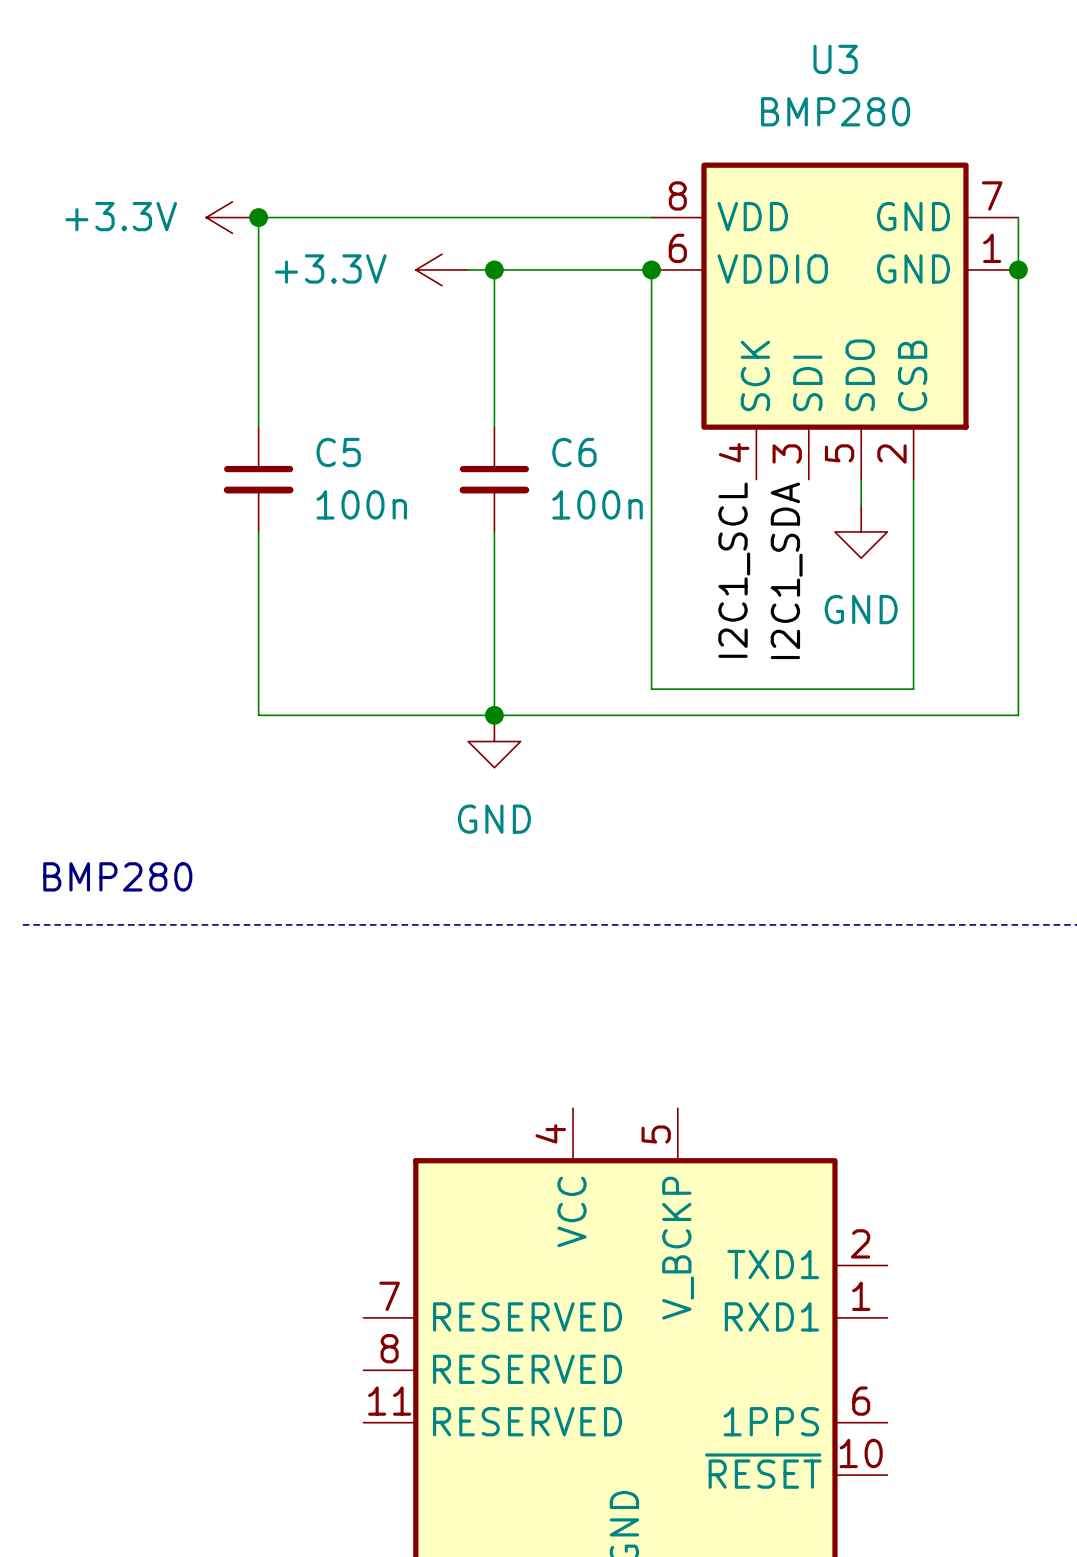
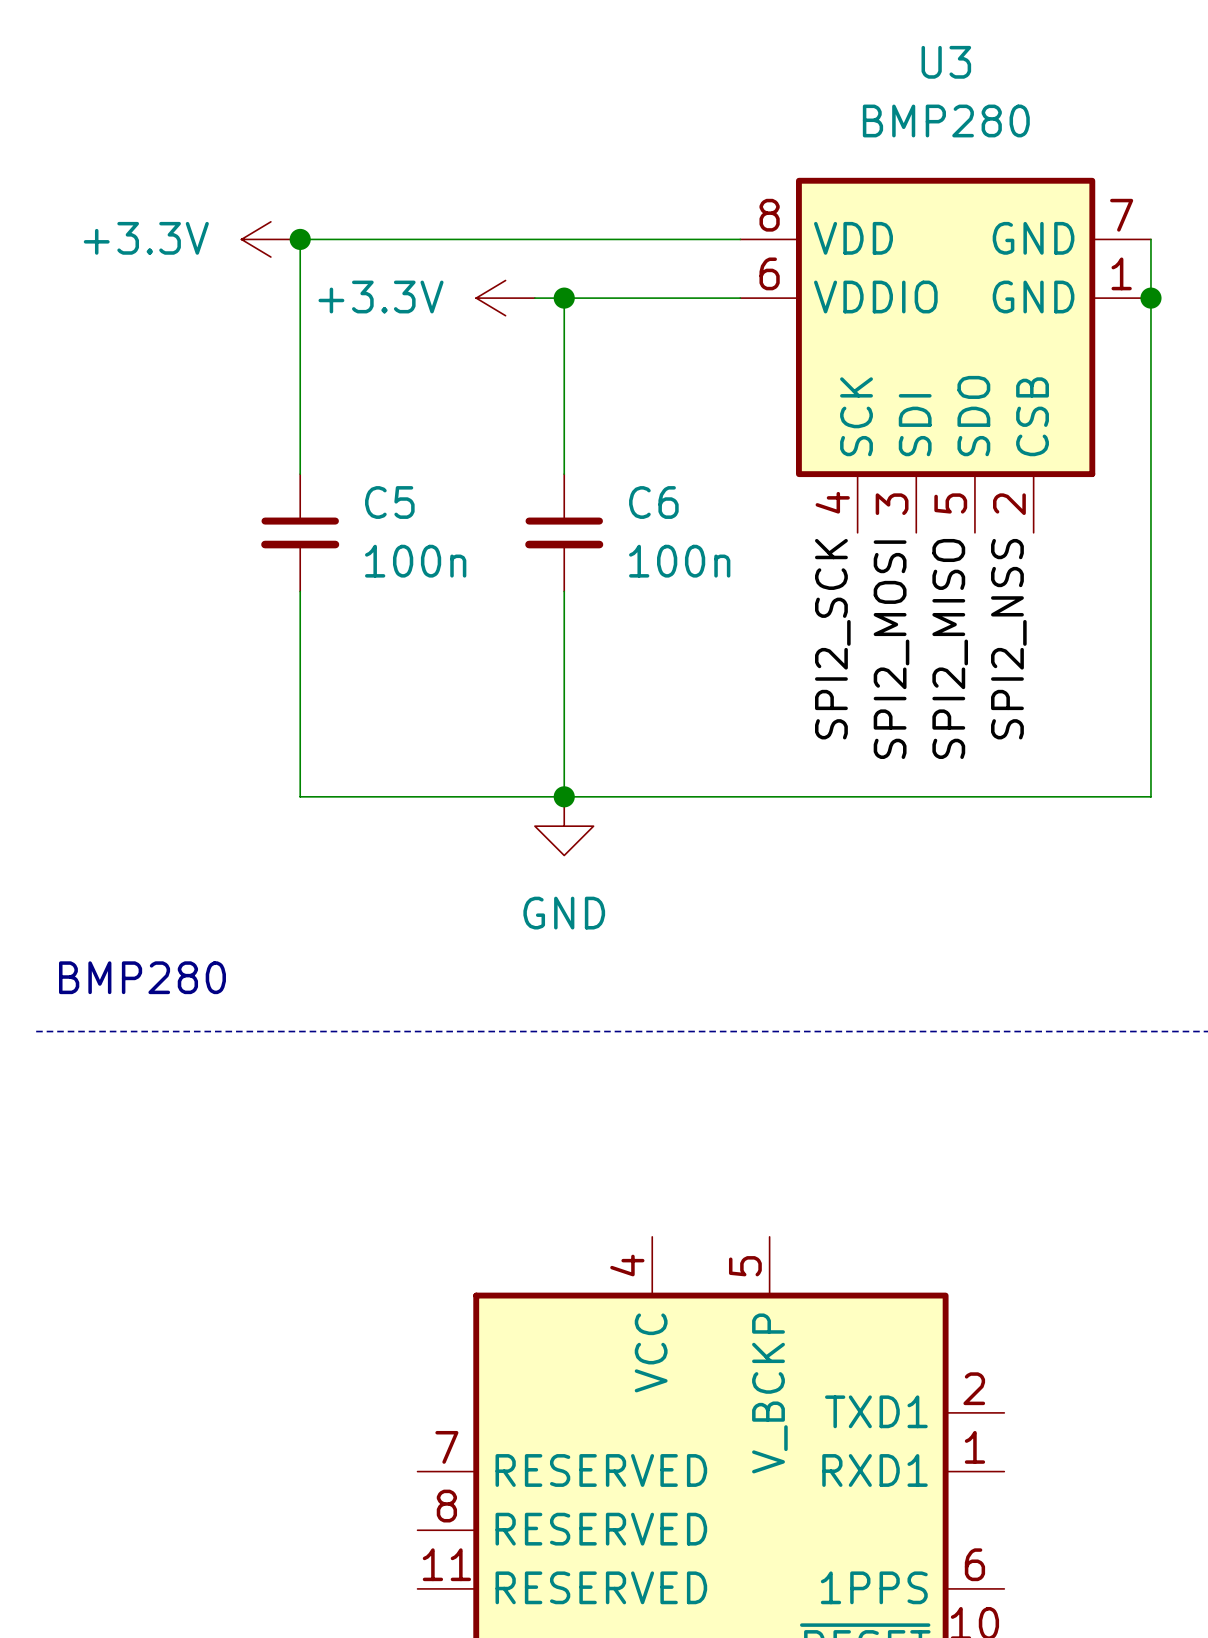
wire: (651, 269) (651, 689) (913, 689) (913, 479) -> none
junction: (651, 269) -> none
wire: (861, 479) (861, 505) -> none
power symbol: GND (861, 531) -> none
label: I2C1_SCL (734, 570) -> SPI2_SCK (832, 639)
label: I2C1_SDA (786, 570) -> SPI2_MOSI (891, 649)
label: none -> SPI2_NSS (1008, 639)
label: none -> SPI2_MISO (950, 648)

